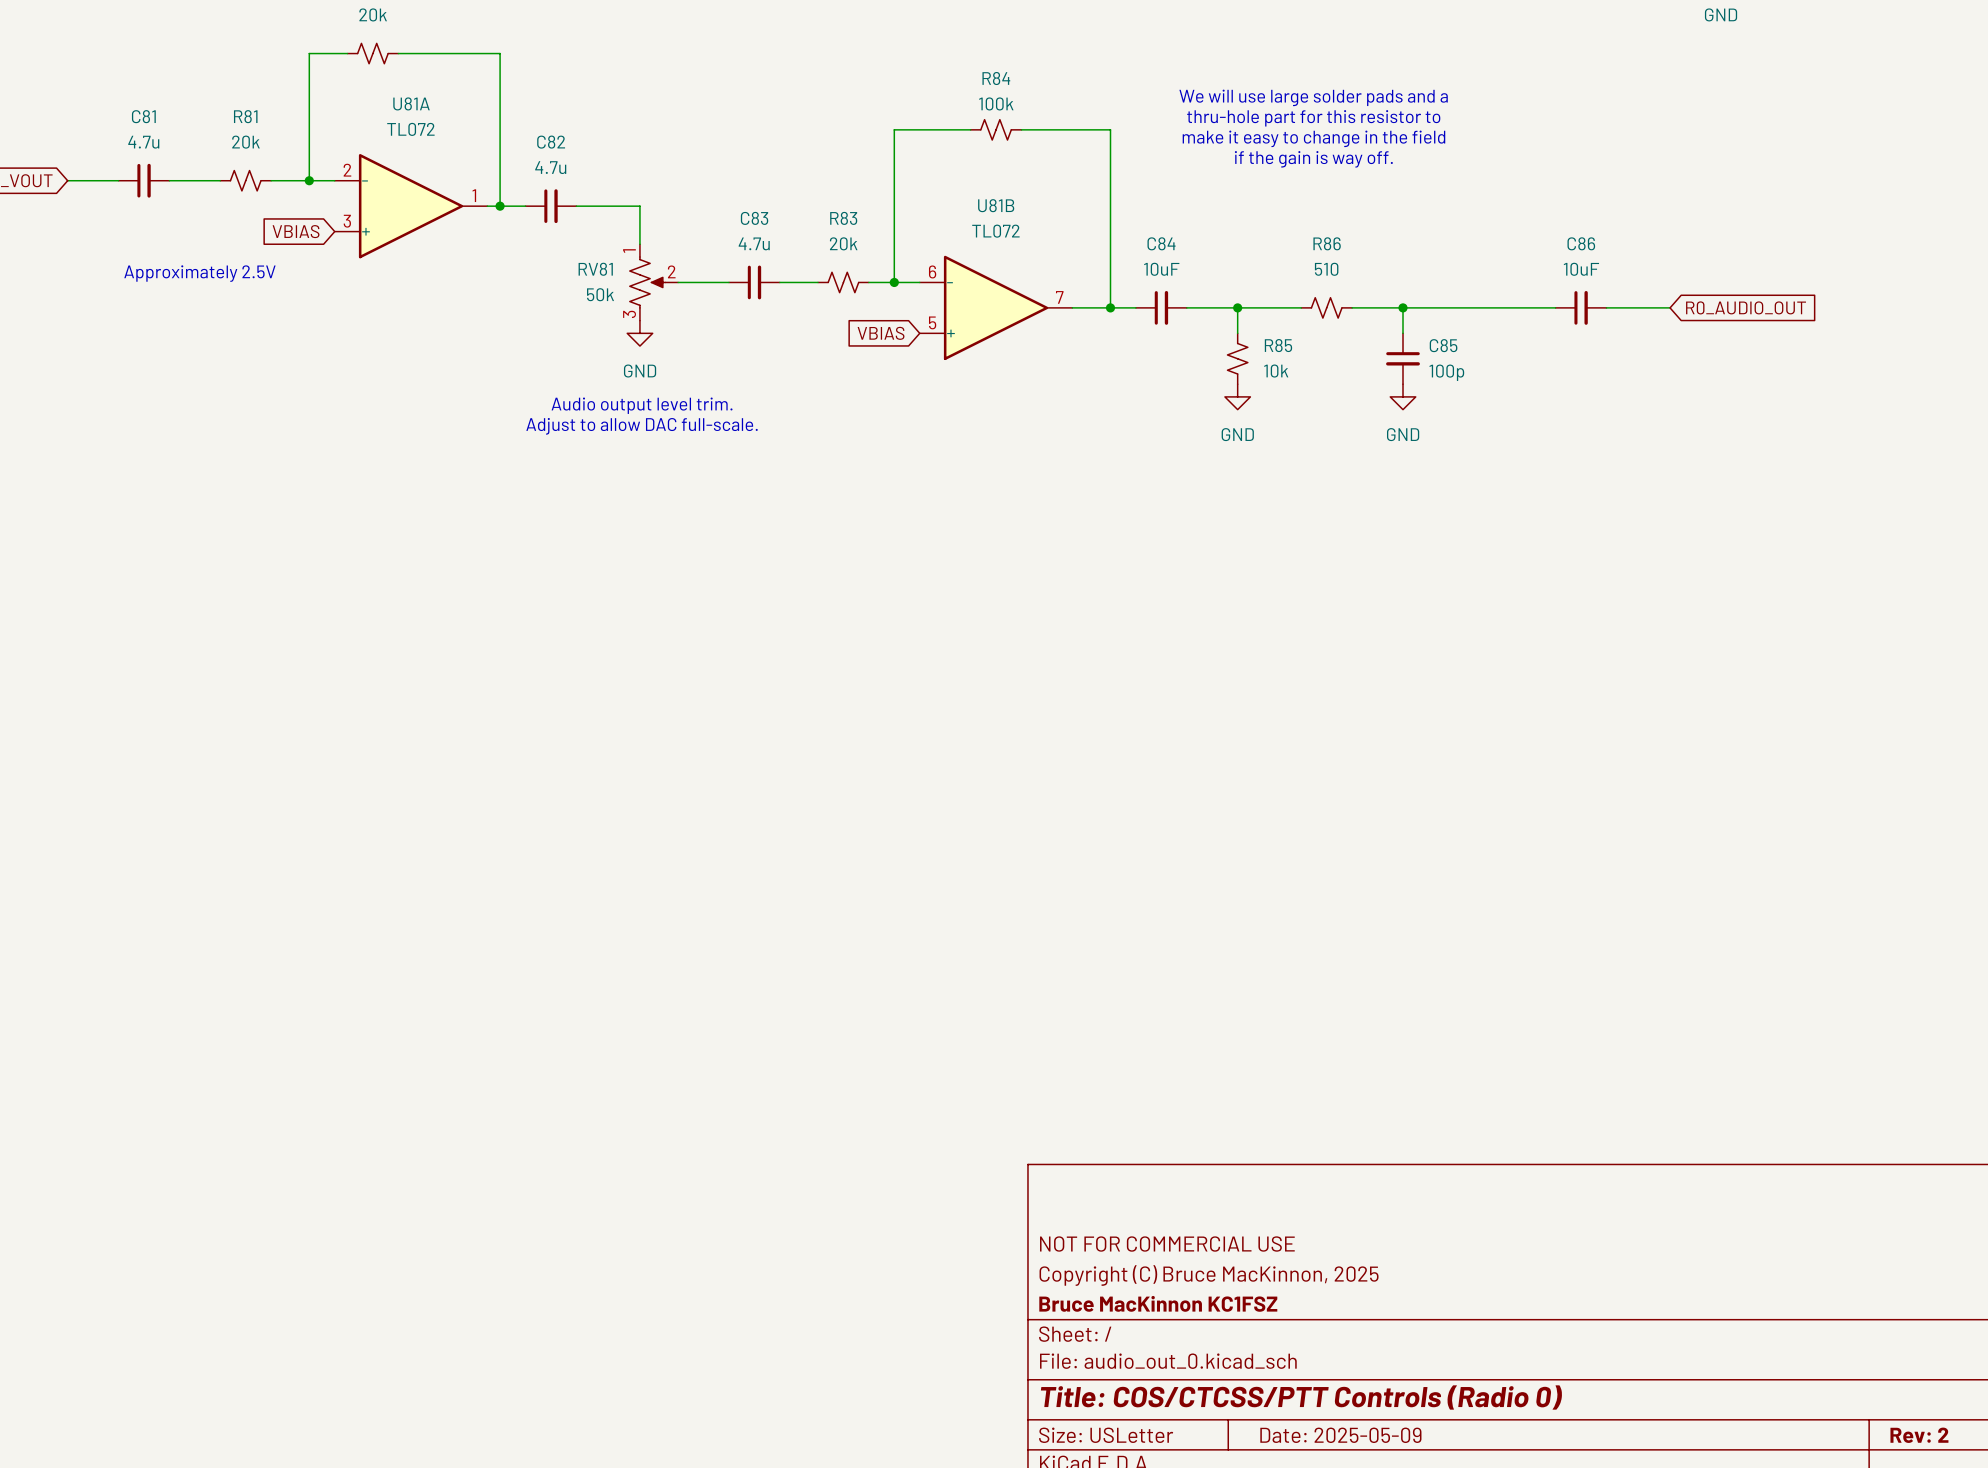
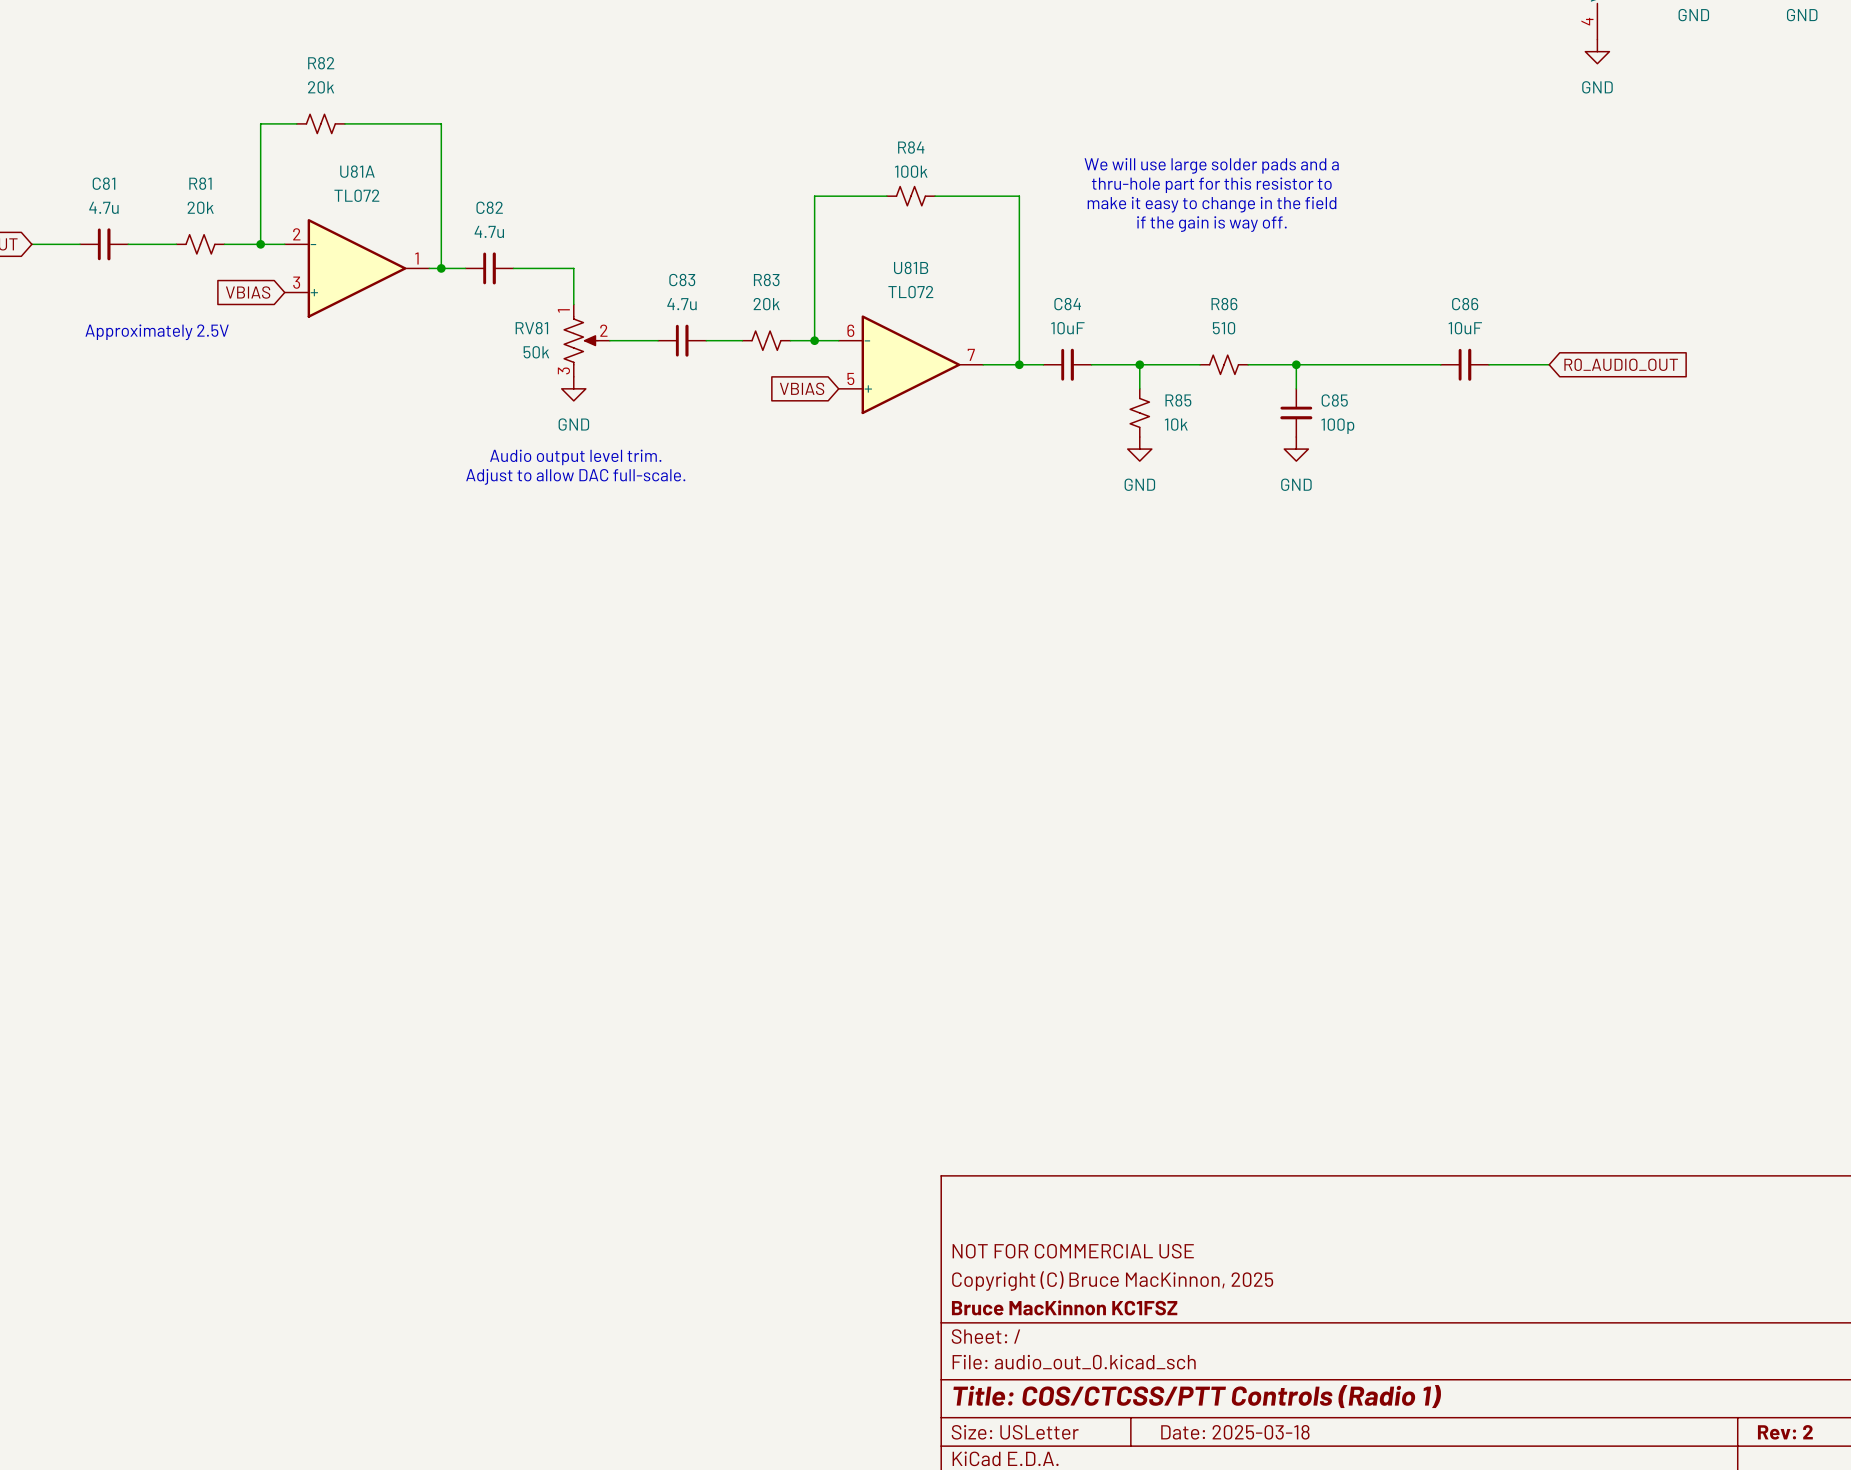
title block: Title: COS/CTCSS/PTT Controls (Radio 0) (1301, 1397) -> Title: COS/CTCSS/PTT Controls (Radio 1) (1197, 1396)
title block: Date: 2025-05-09 (1340, 1435) -> Date: 2025-03-18 (1235, 1432)

